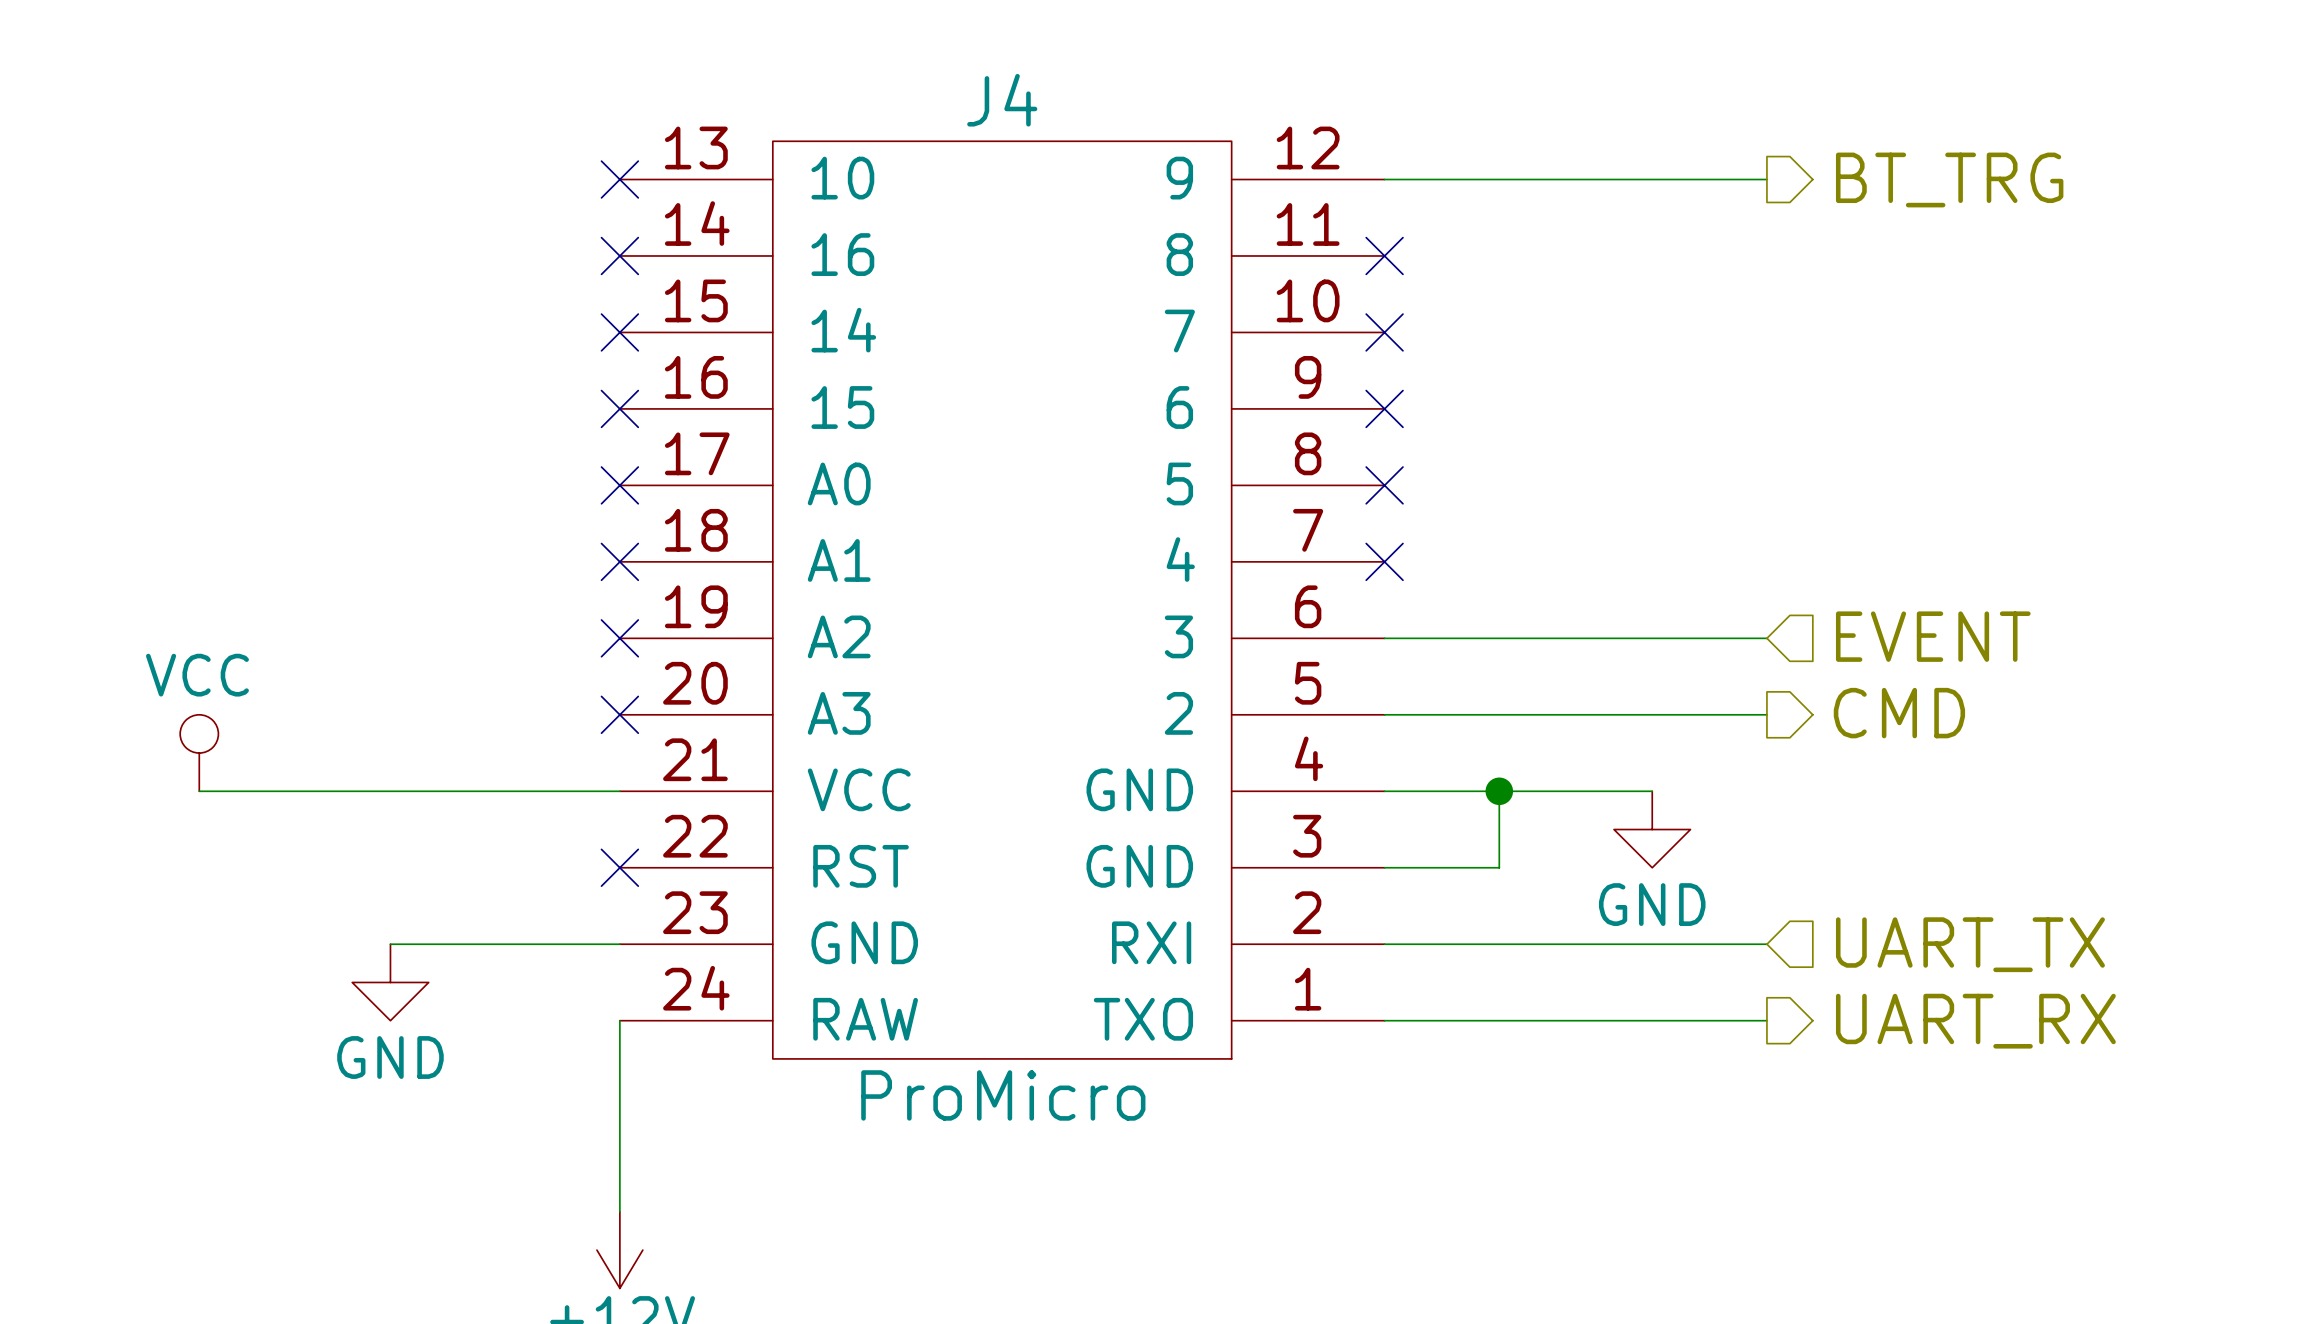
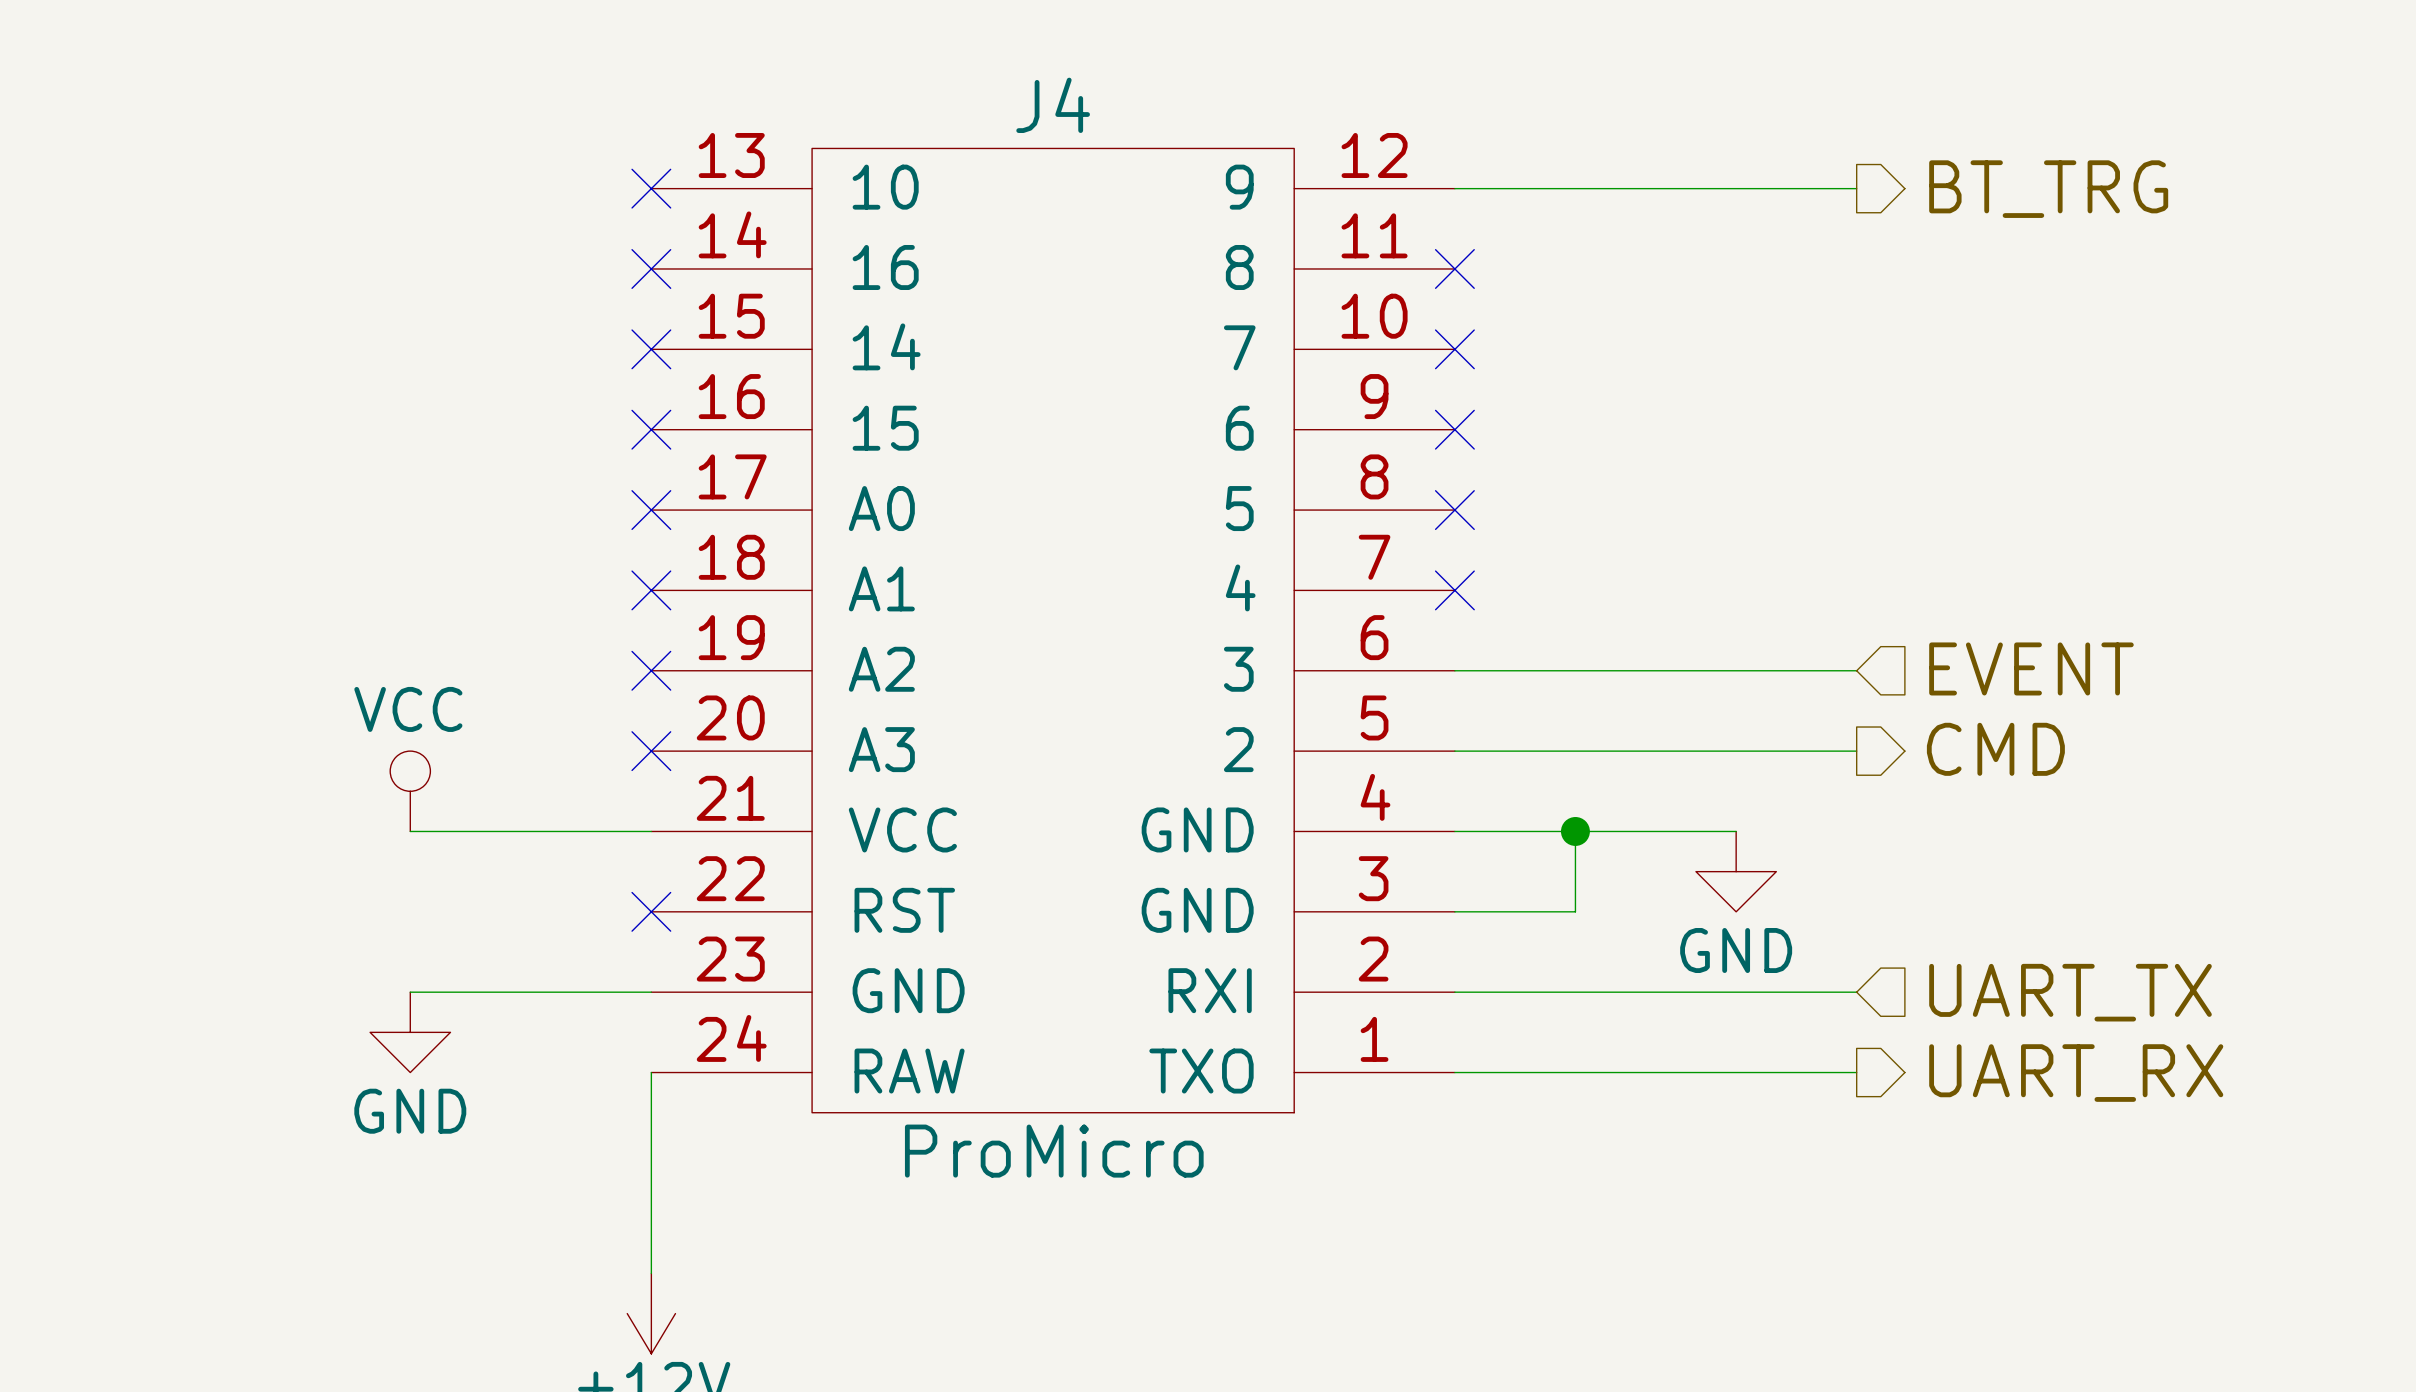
power symbol position: VCC (199, 753) -> VCC (410, 791)
wire: (199, 791) (390, 791) -> none

